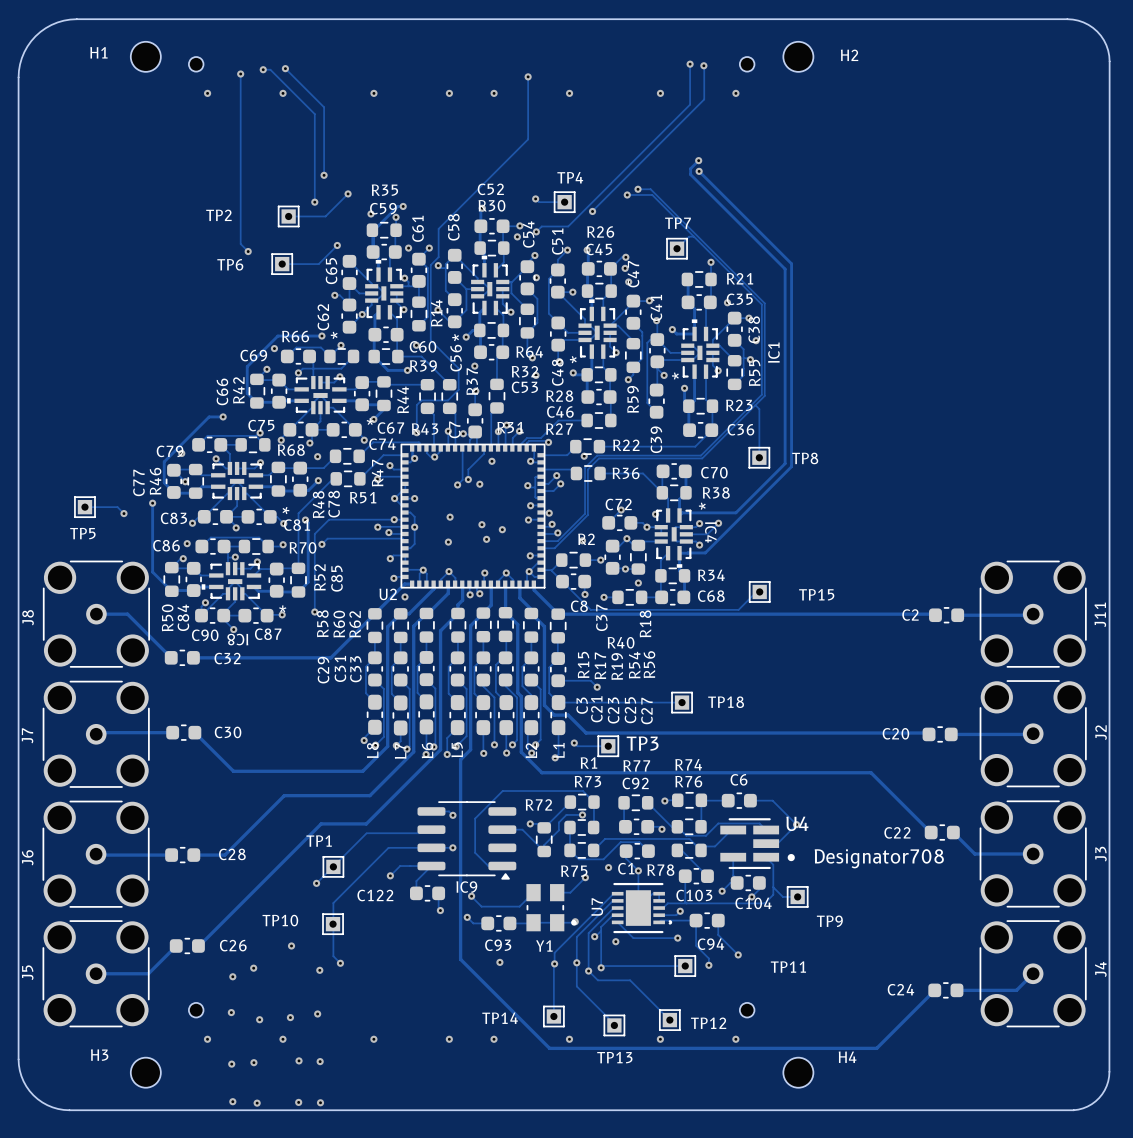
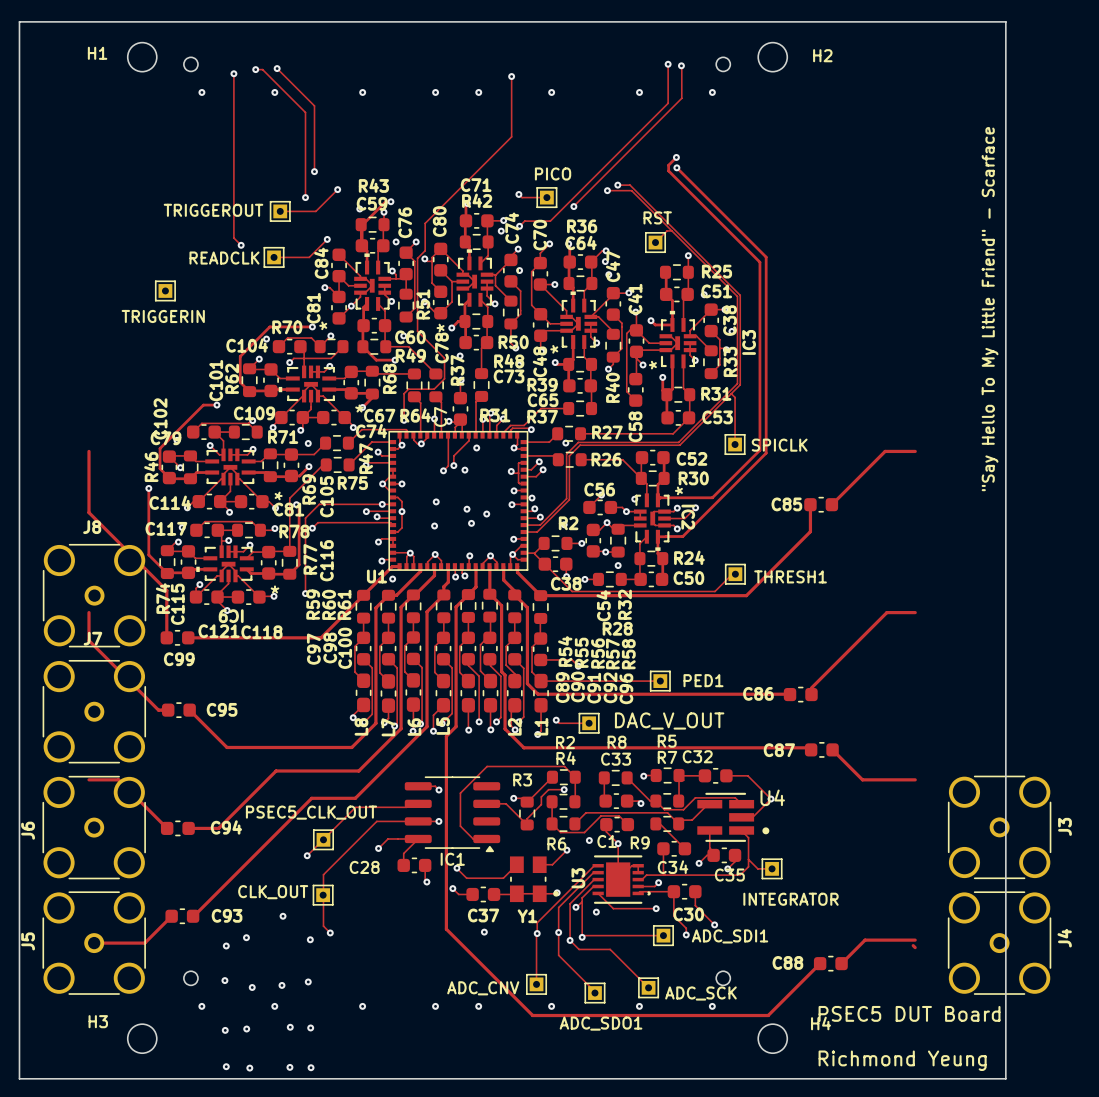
board edge: (76, 19) (1067, 19) (1083, 22) (1097, 31) (1106, 45) (1109, 61) (1109, 1071) (1104, 1090) (1095, 1101) (1087, 1106) (1073, 1110) (69, 1110) (52, 1107) (33, 1095) (23, 1081) (18, 1059) (18, 77) (21, 58) (35, 36) (51, 24) (76, 19) -> (19, 21) (19, 1078) (1005, 1078) (1005, 21) (19, 21)
TP4 name: TP4 (570, 177) -> PICO (553, 173)
C52 name: C52 (490, 189) -> C71 (476, 185)
R35 name: R35 (384, 190) -> R43 (373, 185)
R30 name: R30 (491, 205) -> R42 (477, 200)
TP2 name: TP2 (218, 215) -> TRIGGEROUT (213, 210)
TP7 name: TP7 (678, 223) -> RST (657, 217)
C58 name: C58 (453, 227) -> C80 (439, 221)
C61 name: C61 (418, 228) -> C76 (405, 222)
R26 name: R26 (600, 232) -> R36 (582, 226)
C54 name: C54 (528, 234) -> C74 (511, 228)
C51 name: C51 (557, 241) -> C70 (540, 235)
C45 name: C45 (599, 249) -> C64 (581, 242)
TP6 name: TP6 (230, 264) -> READCLK (224, 258)
C65 name: C65 (331, 271) -> C84 (321, 263)
R21 name: R21 (740, 278) -> R25 (716, 271)
TRIGGERIN: none -> (165, 290)
C35 name: C35 (739, 299) -> C51 (716, 291)
R14 name: R14 (436, 313) -> R51 (423, 304)
C62 name: C62 (323, 317) -> C81 (313, 308)
R66 name: R66 (295, 336) -> R70 (287, 327)
R64 name: R64 (529, 351) -> R50 (513, 342)
IC1 name: IC1 (773, 352) -> IC3 (749, 342)
C69 name: C69 (253, 355) -> C104 (247, 345)
text: none -> "Say Hello To My Little Friend" - Scarface (990, 309)
C56 name: C56 (456, 358) -> C78 (441, 347)
R39 name: R39 (423, 366) -> R49 (410, 355)
R32 name: R32 (524, 371) -> R48 (509, 361)
R55 name: R55 (754, 372) -> R33 (730, 361)
C53 name: C53 (524, 387) -> C73 (509, 376)
R42 name: R42 (238, 390) -> R62 (232, 378)
C66 name: C66 (222, 391) -> C101 (216, 380)
R28 name: R28 (559, 396) -> R39 (542, 384)
R44 name: R44 (403, 399) -> R68 (389, 378)
R59 name: R59 (633, 399) -> R40 (612, 387)
R23 name: R23 (739, 405) -> R31 (716, 393)
C46 name: C46 (560, 411) -> C65 (543, 400)
C75 name: C75 (261, 425) -> C109 (254, 413)
R43 name: R43 (425, 429) -> R64 (415, 415)
R27 name: R27 (559, 429) -> R37 (542, 416)
C36 name: C36 (740, 429) -> C53 (717, 417)
C39 name: C39 (656, 439) -> C58 (635, 426)
R22 name: R22 (626, 445) -> R27 (607, 432)
R68 name: R68 (291, 450) -> R71 (283, 437)
TP8 name: TP8 (805, 458) -> SPICLK (779, 445)
track: none -> (915, 451) (885, 451) (831, 504)
C70 name: C70 (714, 472) -> C52 (691, 458)
R36 name: R36 (626, 473) -> R26 (606, 459)
C77 name: C77 (138, 482) -> C102 (160, 418)
R38 name: R38 (716, 492) -> R30 (693, 478)
R51 name: R51 (363, 497) -> R75 (352, 483)
R48 name: R48 (318, 504) -> R69 (309, 489)
C78 name: C78 (334, 504) -> C105 (326, 496)
C72 name: C72 (618, 504) -> C56 (599, 489)
track: (84, 507) (117, 507) (123, 513) -> none
TP5: (84, 507) -> none
via: (123, 513) -> none
C83 name: C83 (173, 518) -> C114 (170, 502)
C85: none -> (821, 504)
IC4 name: IC4 (710, 532) -> IC2 (688, 517)
C86 name: C86 (166, 545) -> C117 (166, 528)
R70 name: R70 (302, 547) -> R78 (294, 531)
R34 name: R34 (711, 575) -> R24 (689, 557)
R52 name: R52 (319, 577) -> R77 (310, 559)
C85 name: C85 (336, 578) -> C116 (326, 560)
U2 name: U2 (388, 594) -> U1 (377, 576)
TP15 name: TP15 (816, 594) -> THRESH1 (790, 576)
C68 name: C68 (711, 596) -> C50 (688, 578)
C8 name: C8 (579, 606) -> C38 (566, 583)
track: (96, 614) (127, 614) (171, 657) -> (89, 451) (89, 512) (166, 590) (166, 637)
track: (771, 614) (935, 615) -> (746, 595) (810, 531) (810, 504)
track: (1033, 614) (957, 615) -> none
J11: (1033, 614) -> none
C2: (946, 615) -> none
J8 name rotation: 0° (28, 617) -> 90° clockwise (92, 527)
J8 name position: J8 (28, 617) -> J8 (92, 527)
R50 name: R50 (167, 617) -> R74 (163, 598)
C84 name: C84 (183, 617) -> C115 (177, 604)
C37 name: C37 (601, 617) -> C54 (603, 605)
R58 name: R58 (322, 623) -> R59 (313, 604)
R18 name: R18 (645, 623) -> R32 (625, 604)
R62 name: R62 (355, 624) -> R61 (344, 604)
track: none -> (915, 612) (886, 612) (811, 687) (811, 694)
C87 name: C87 (268, 634) -> C118 (261, 632)
C90 name: C90 (205, 635) -> C121 (219, 631)
IC8 name: IC8 (237, 639) -> IC9 (231, 616)
R40 name: R40 (621, 642) -> R28 (617, 628)
C32 name: C32 (227, 658) -> C99 (179, 659)
R56 name: R56 (649, 664) -> R58 (628, 654)
R15 name: R15 (583, 665) -> R54 (565, 651)
R17 name: R17 (600, 665) -> R55 (581, 652)
R54 name: R54 (634, 665) -> R57 (612, 653)
R19 name: R19 (617, 666) -> R56 (598, 653)
C31 name: C31 (340, 668) -> C98 (330, 648)
C33 name: C33 (355, 669) -> C100 (345, 648)
C29 name: C29 (323, 670) -> C97 (313, 649)
TP18 name: TP18 (726, 702) -> PED1 (703, 680)
C3 name: C3 (582, 705) -> C89 (562, 687)
C21 name: C21 (596, 709) -> C90 (577, 686)
C23 name: C23 (613, 710) -> C91 (594, 688)
C25 name: C25 (630, 710) -> C92 (610, 687)
C27 name: C27 (646, 711) -> C96 (626, 688)
track: (554, 715) (568, 715) (586, 733) (929, 734) -> (536, 693) (792, 694)
C86: none -> (800, 694)
track: (162, 732) (97, 732) (96, 734) -> (158, 710) (89, 640) (89, 612)
C30 name: C30 (228, 732) -> C95 (222, 709)
track: (1033, 733) (951, 734) -> none
J2: (1033, 733) -> none
C20: (940, 734) -> none
J7 name rotation: 0° (27, 735) -> 90° clockwise (92, 638)
J7 name position: J7 (27, 735) -> J7 (92, 638)
TP3 name: TP3 (642, 743) -> DAC_V_OUT (669, 720)
R1 name: R1 (588, 763) -> R2 (565, 742)
R74 name: R74 (688, 764) -> R5 (667, 741)
R77 name: R77 (636, 765) -> R8 (617, 742)
track: (540, 771) (871, 772) (931, 832) -> (523, 747) (809, 747) (811, 749)
C87: none -> (821, 749)
track: none -> (832, 749) (862, 779) (915, 779)
C6 name: C6 (739, 779) -> C32 (697, 756)
R73 name: R73 (587, 781) -> R4 (566, 758)
R76 name: R76 (688, 781) -> R7 (667, 757)
C92 name: C92 (635, 783) -> C33 (616, 759)
R72 name: R72 (538, 804) -> R3 (522, 779)
C22: (942, 832) -> none
track: (953, 832) (974, 853) (1033, 853) -> none
TP1 name: TP1 (319, 841) -> PSEC5_CLK_OUT (311, 812)
track: (96, 854) (171, 855) -> (89, 779) (118, 779) (167, 828)
C28 name: C28 (232, 854) -> C94 (226, 827)
U4 text: Designator708 (879, 858) -> none
R78 name: R78 (660, 870) -> R9 (640, 842)
R75 name: R75 (574, 871) -> R6 (556, 843)
IC9 name: IC9 (466, 887) -> IC1 (452, 859)
C122 name: C122 (375, 895) -> C28 (364, 867)
C103 name: C103 (694, 895) -> C34 (673, 867)
C104 name: C104 (753, 903) -> C35 (729, 875)
U7 name: U7 (597, 907) -> U3 (578, 878)
TP10 name: TP10 (280, 920) -> CLK_OUT (273, 892)
TP9 name: TP9 (829, 921) -> INTEGRATOR (790, 899)
C94 name: C94 (710, 944) -> C30 (688, 914)
C26 name: C26 (233, 945) -> C93 (227, 915)
C93 name: C93 (498, 945) -> C37 (483, 915)
TP11 name: TP11 (788, 967) -> ADC_SDI1 (730, 936)
track: none -> (915, 940) (865, 940) (841, 962)
track: (1033, 973) (1016, 990) (956, 990) -> none
track: none -> (913, 945) (915, 947)
track: (934, 990) (876, 1048) (549, 1048) -> (820, 963) (768, 1015) (532, 1015)
C24: (945, 990) -> none
C88: none -> (830, 963)
TP14 name: TP14 (500, 1018) -> ADC_CNV (483, 988)
TP12 name: TP12 (708, 1023) -> ADC_SCK (700, 993)
text: none -> PSEC5 DUT Board (909, 1013)
TP13 name: TP13 (614, 1057) -> ADC_SDO1 (601, 1023)
text: none -> Richmond Yeung (902, 1060)

